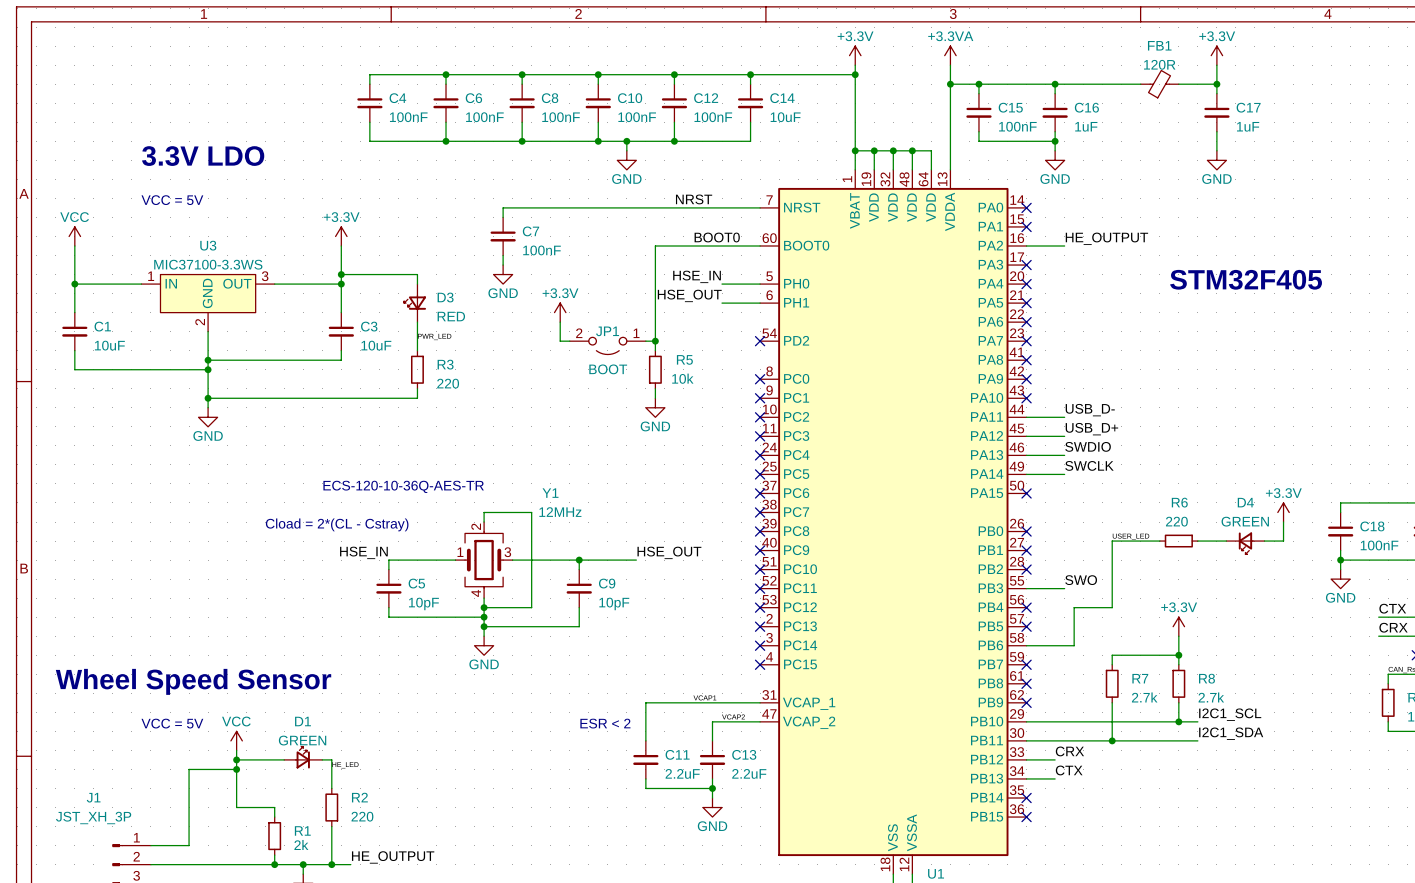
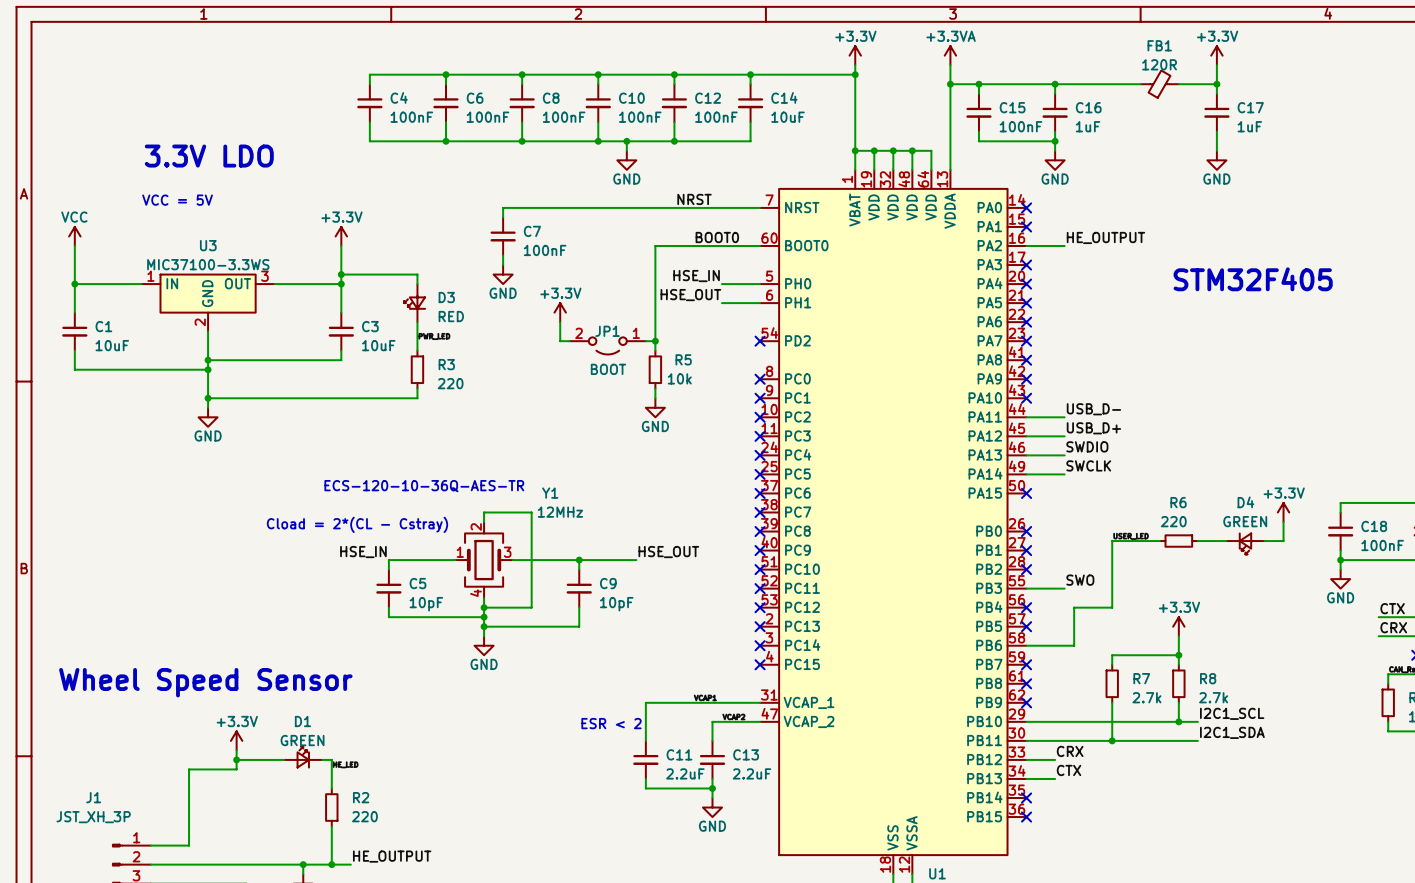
text: VCC = 5V (172, 723) -> none
power symbol: VCC (236, 740) -> +3.3V (236, 740)
wire: (236, 769) (236, 807) (274, 807) (274, 817) -> none
junction: (236, 769) -> none
R1: 2k (274, 836) -> none
wire: (274, 855) (274, 864) -> none
junction: (274, 864) -> none

